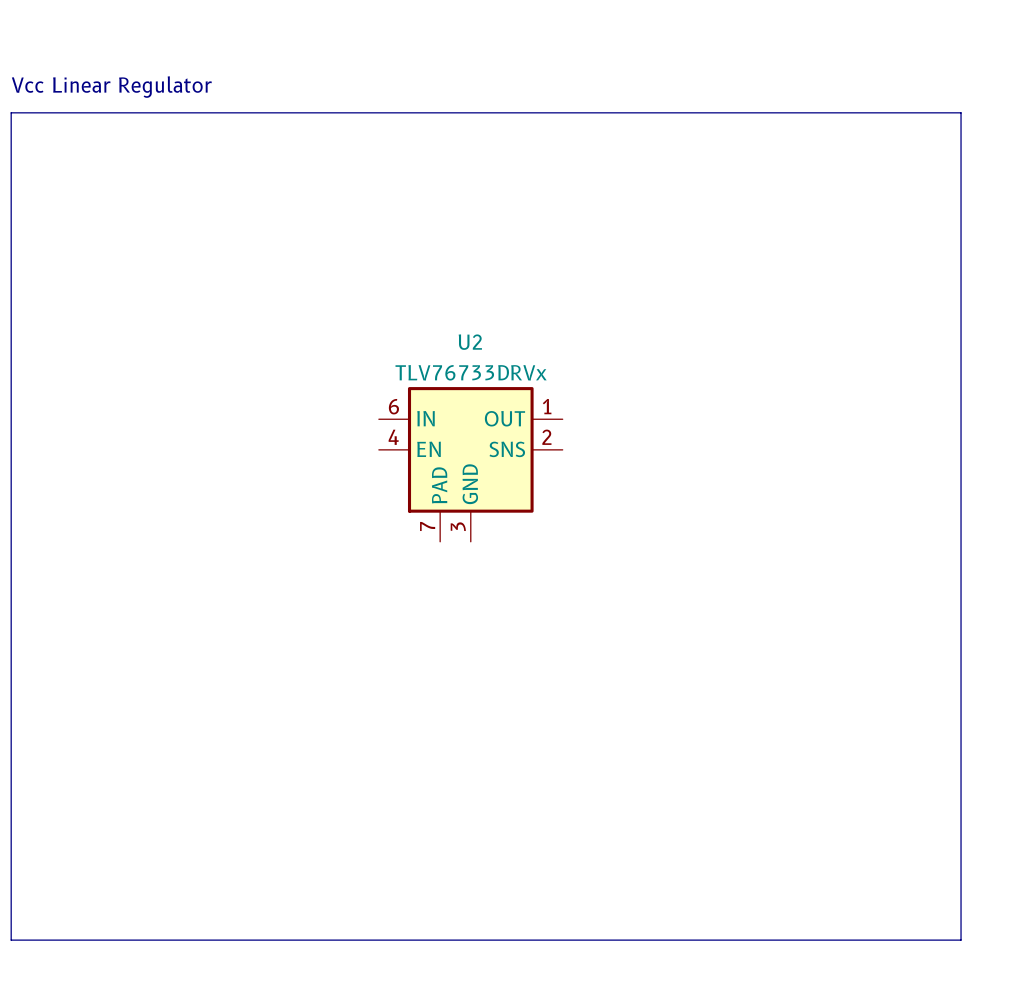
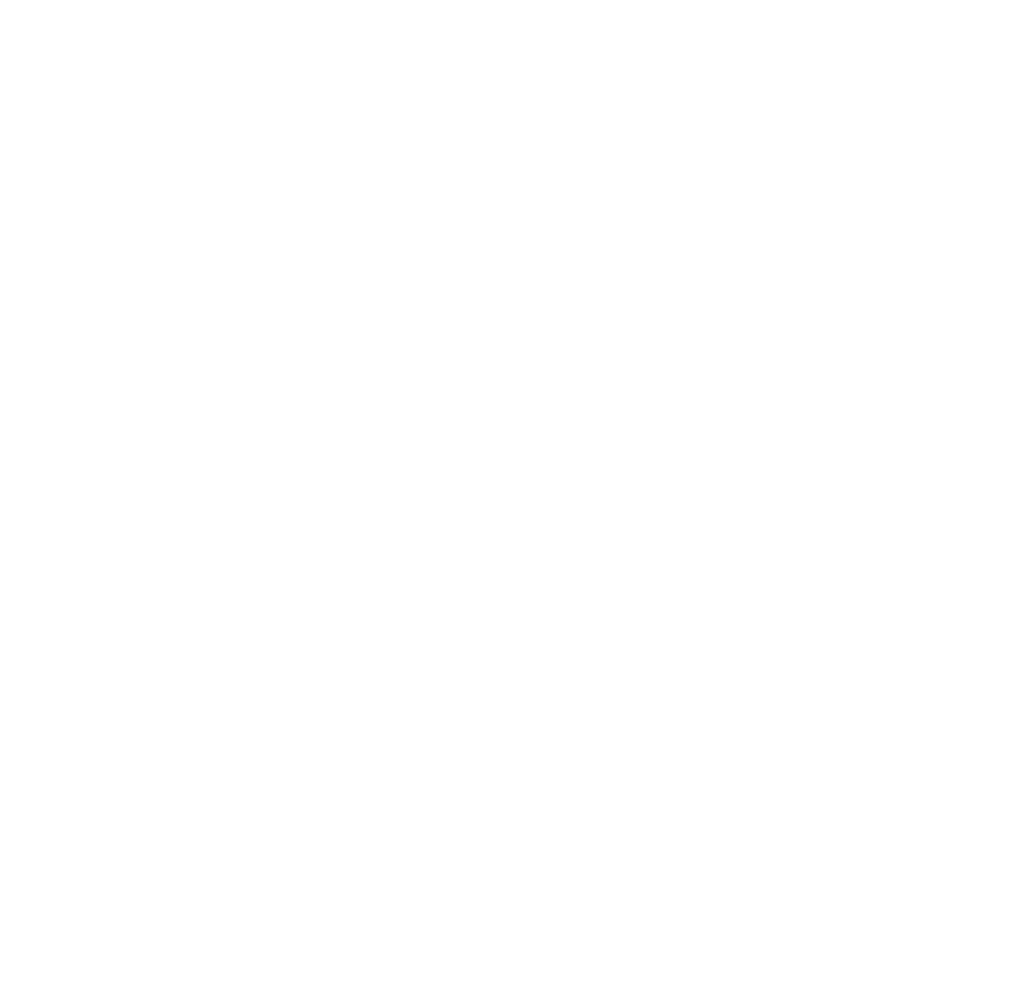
text: Vcc Linear Regulator (111, 87) -> none
line: (11, 112) (961, 112) (961, 940) (11, 940) (11, 112) -> none
U2: TLV76733DRVx (470, 464) -> none

